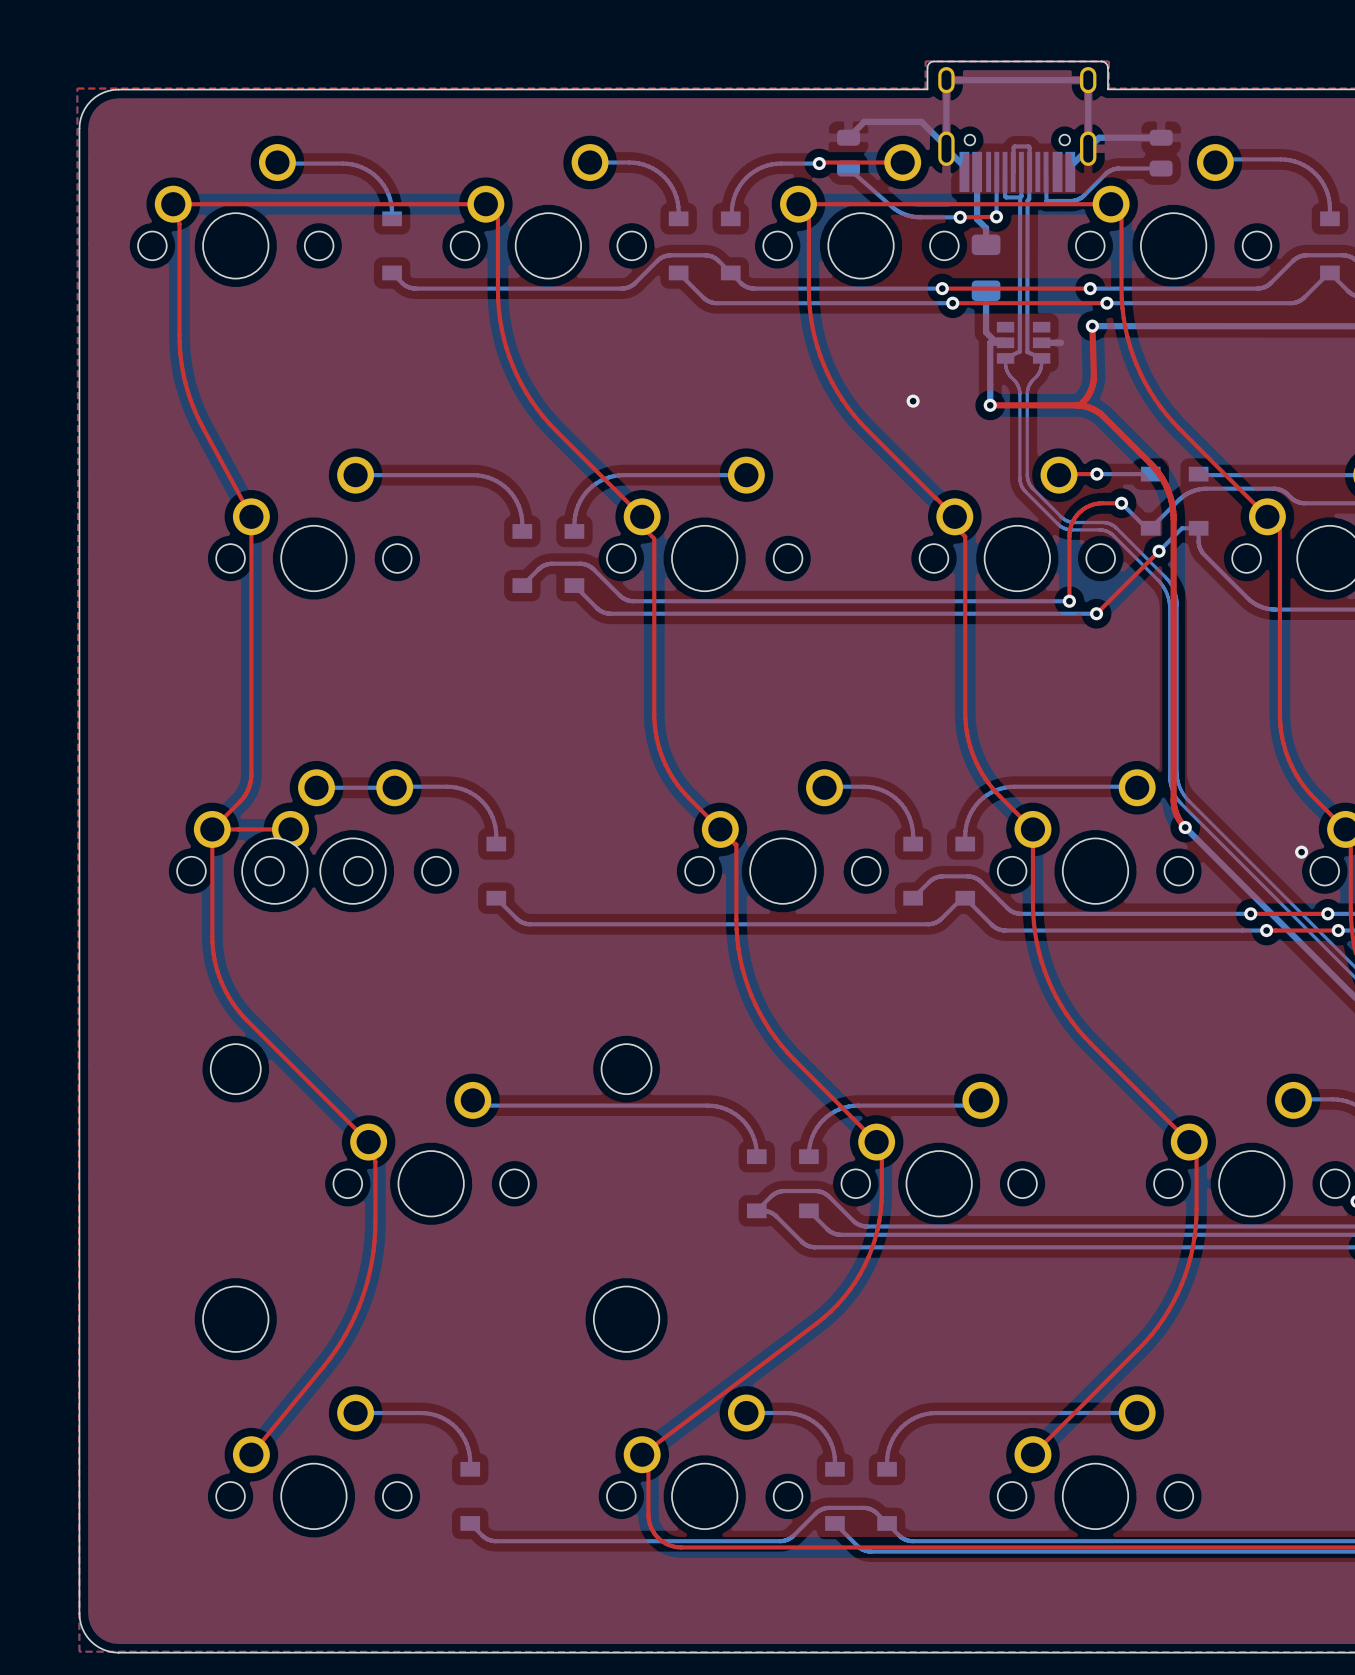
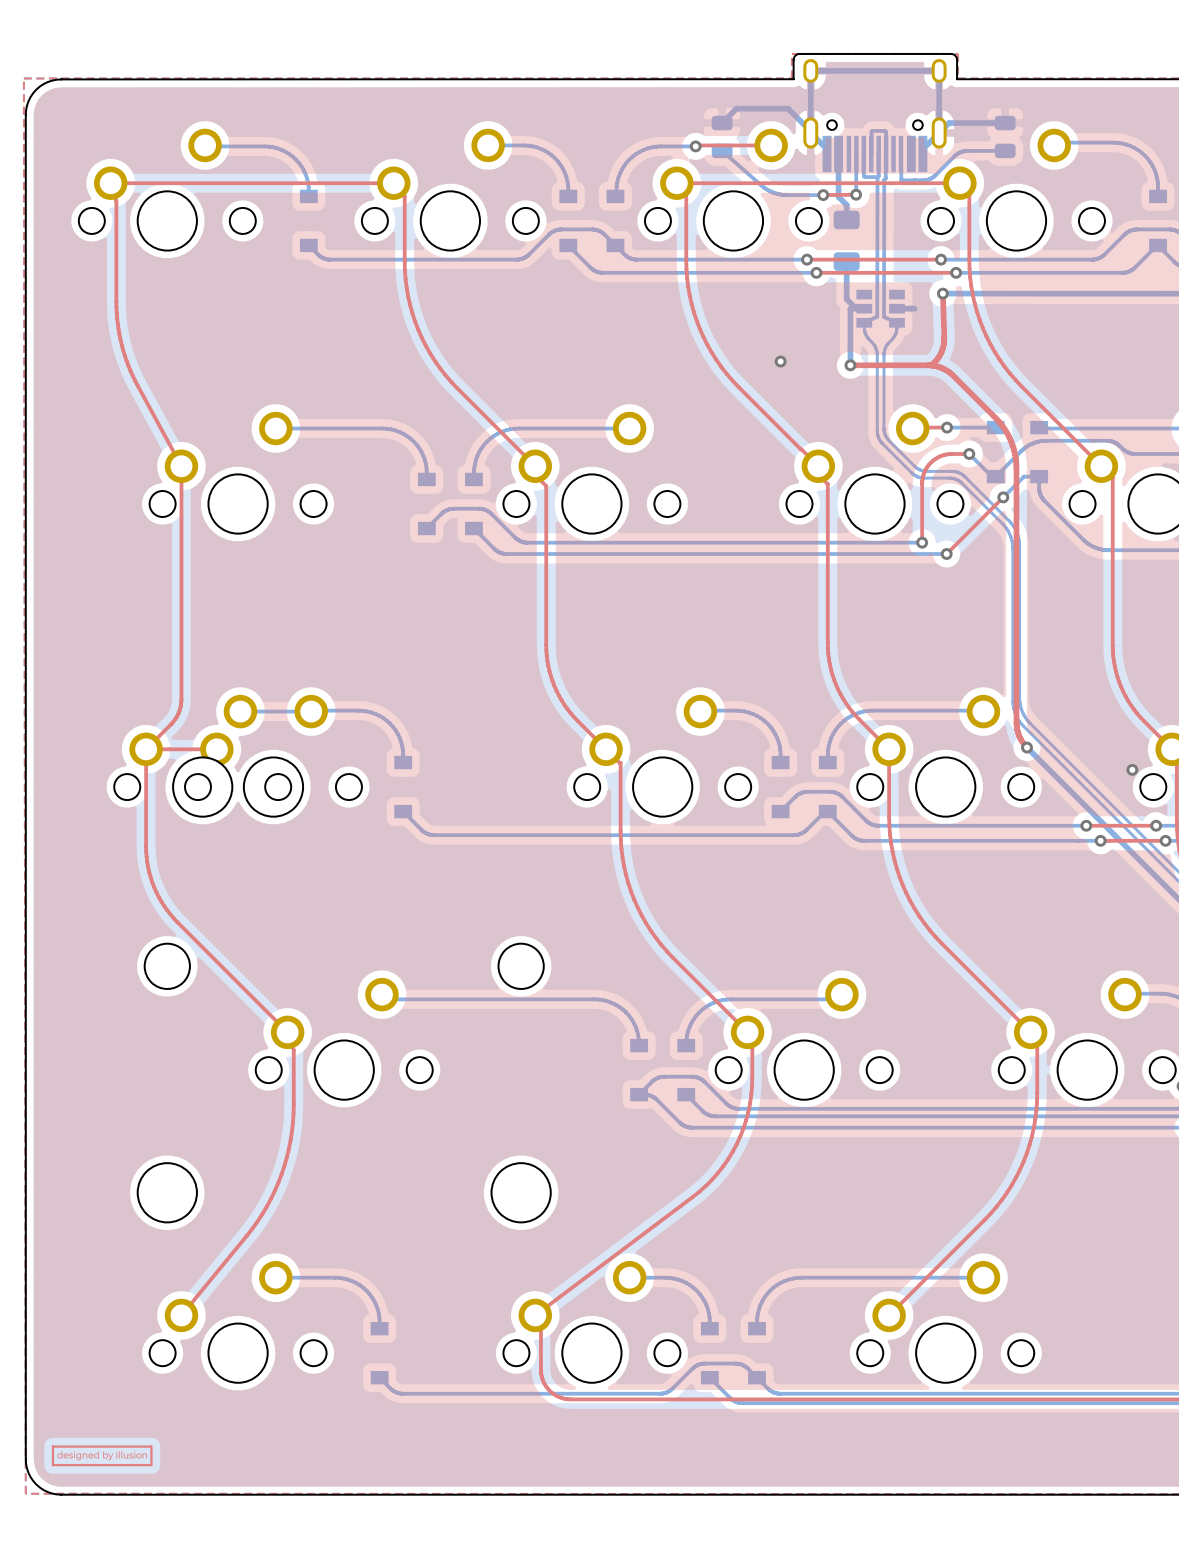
drawing: none -> [51, 1445, 153, 1467]

